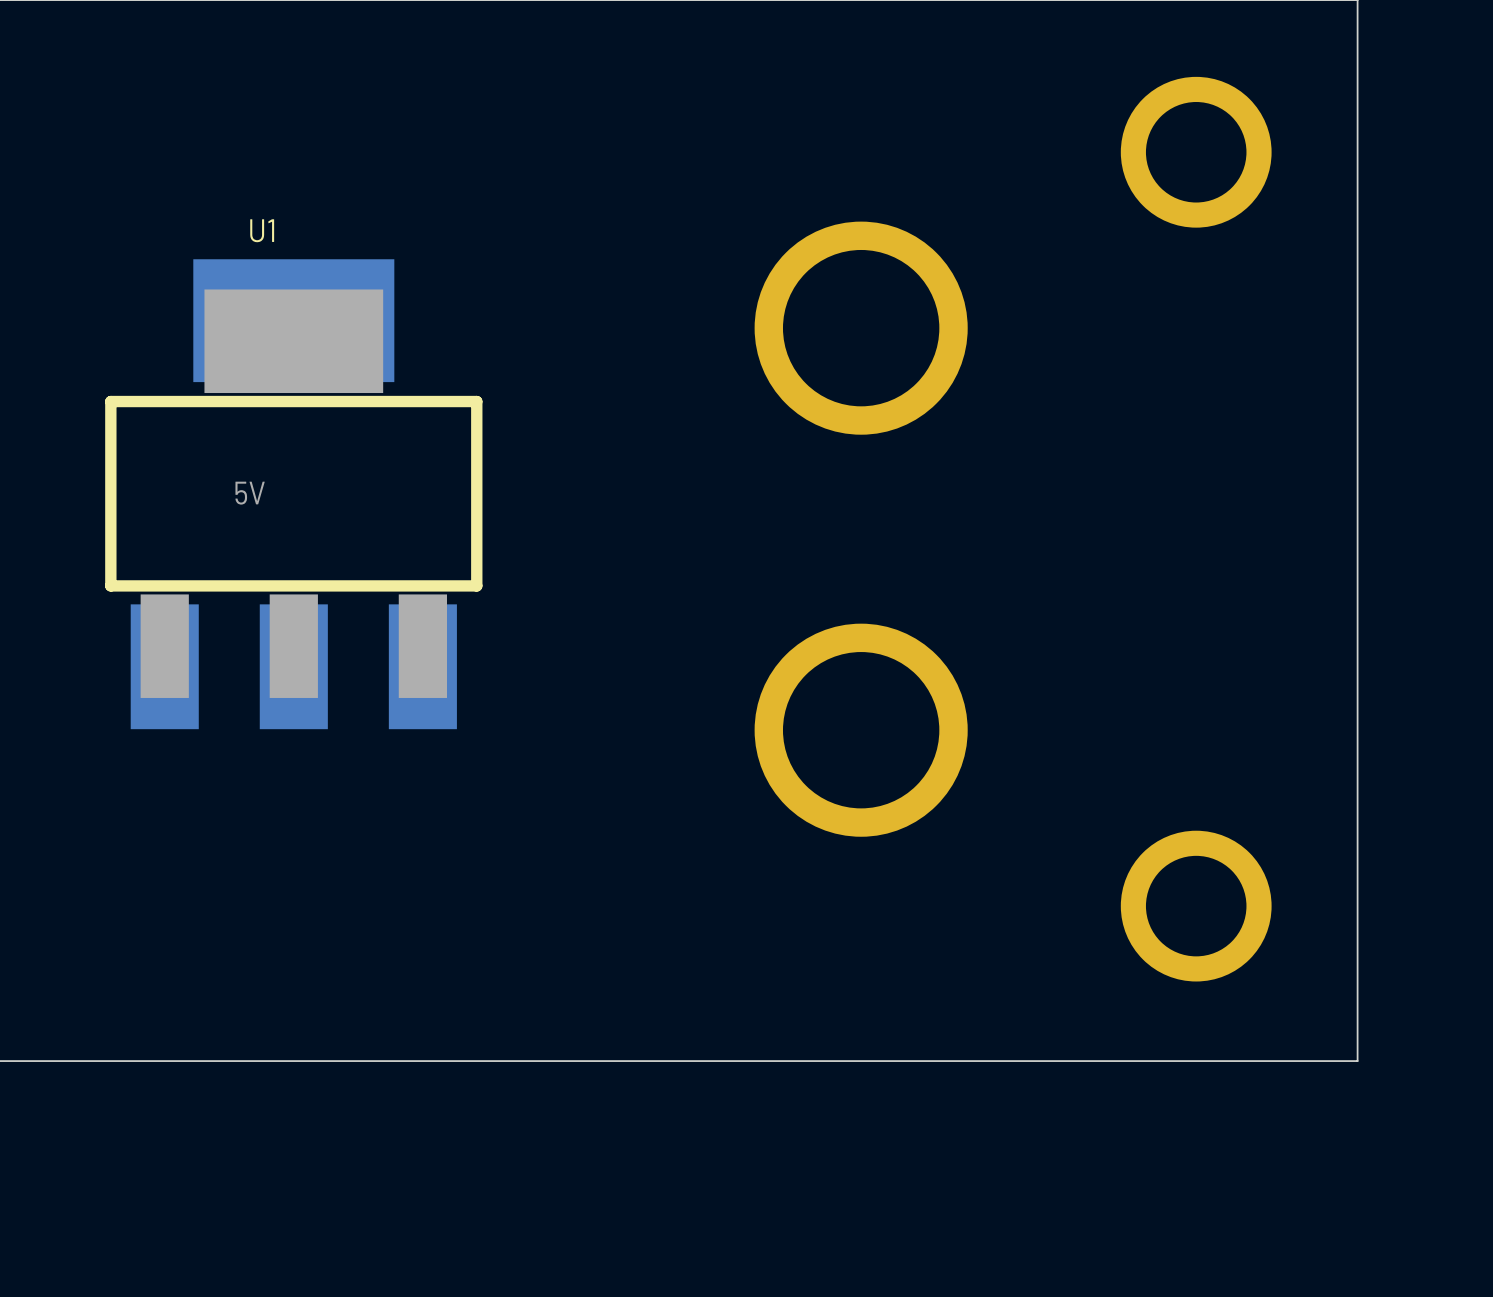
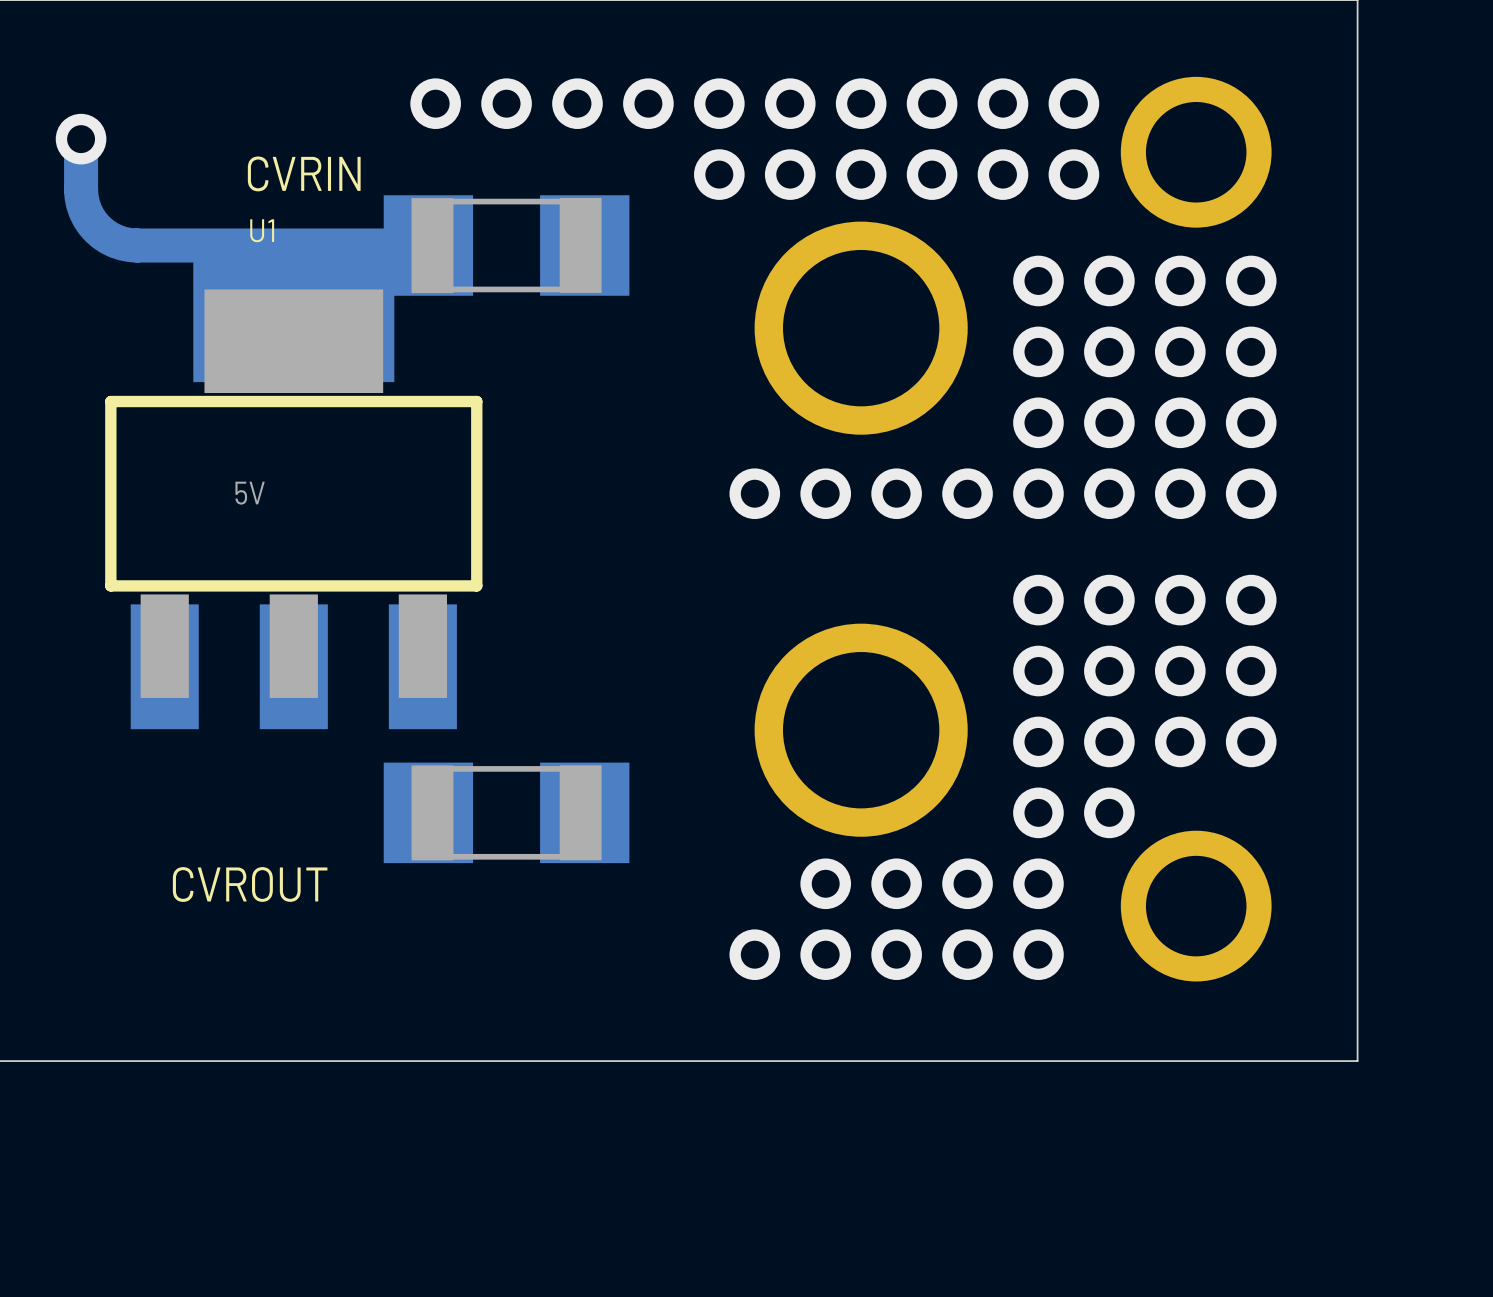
via: none -> (435, 103)
via: none -> (506, 103)
via: none -> (577, 103)
via: none -> (648, 103)
via: none -> (719, 103)
via: none -> (790, 103)
via: none -> (861, 103)
via: none -> (932, 103)
via: none -> (1002, 103)
via: none -> (1073, 103)
track: none -> (81, 139) (81, 189) (85, 210) (97, 229) (109, 238) (122, 243) (137, 245) (428, 245)
via: none -> (81, 139)
via: none -> (719, 174)
via: none -> (790, 174)
via: none -> (861, 174)
via: none -> (932, 174)
via: none -> (1002, 174)
via: none -> (1073, 174)
CVRIN: none -> (506, 245)
via: none -> (1038, 280)
via: none -> (1109, 280)
via: none -> (1180, 280)
via: none -> (1251, 280)
via: none -> (1038, 351)
via: none -> (1109, 351)
via: none -> (1180, 351)
via: none -> (1251, 351)
via: none -> (1038, 422)
via: none -> (1109, 422)
via: none -> (1180, 422)
via: none -> (1251, 422)
via: none -> (754, 493)
via: none -> (825, 493)
via: none -> (896, 493)
via: none -> (967, 493)
via: none -> (1038, 493)
via: none -> (1109, 493)
via: none -> (1180, 493)
via: none -> (1251, 493)
via: none -> (1038, 600)
via: none -> (1109, 600)
via: none -> (1180, 600)
via: none -> (1251, 600)
via: none -> (1038, 671)
via: none -> (1109, 671)
via: none -> (1180, 671)
via: none -> (1251, 671)
via: none -> (1038, 741)
via: none -> (1109, 741)
via: none -> (1180, 741)
via: none -> (1251, 741)
CVROUT: none -> (506, 812)
via: none -> (1038, 812)
via: none -> (1109, 812)
via: none -> (825, 883)
via: none -> (896, 883)
via: none -> (967, 883)
via: none -> (1038, 883)
via: none -> (754, 954)
via: none -> (825, 954)
via: none -> (896, 954)
via: none -> (967, 954)
via: none -> (1038, 954)

